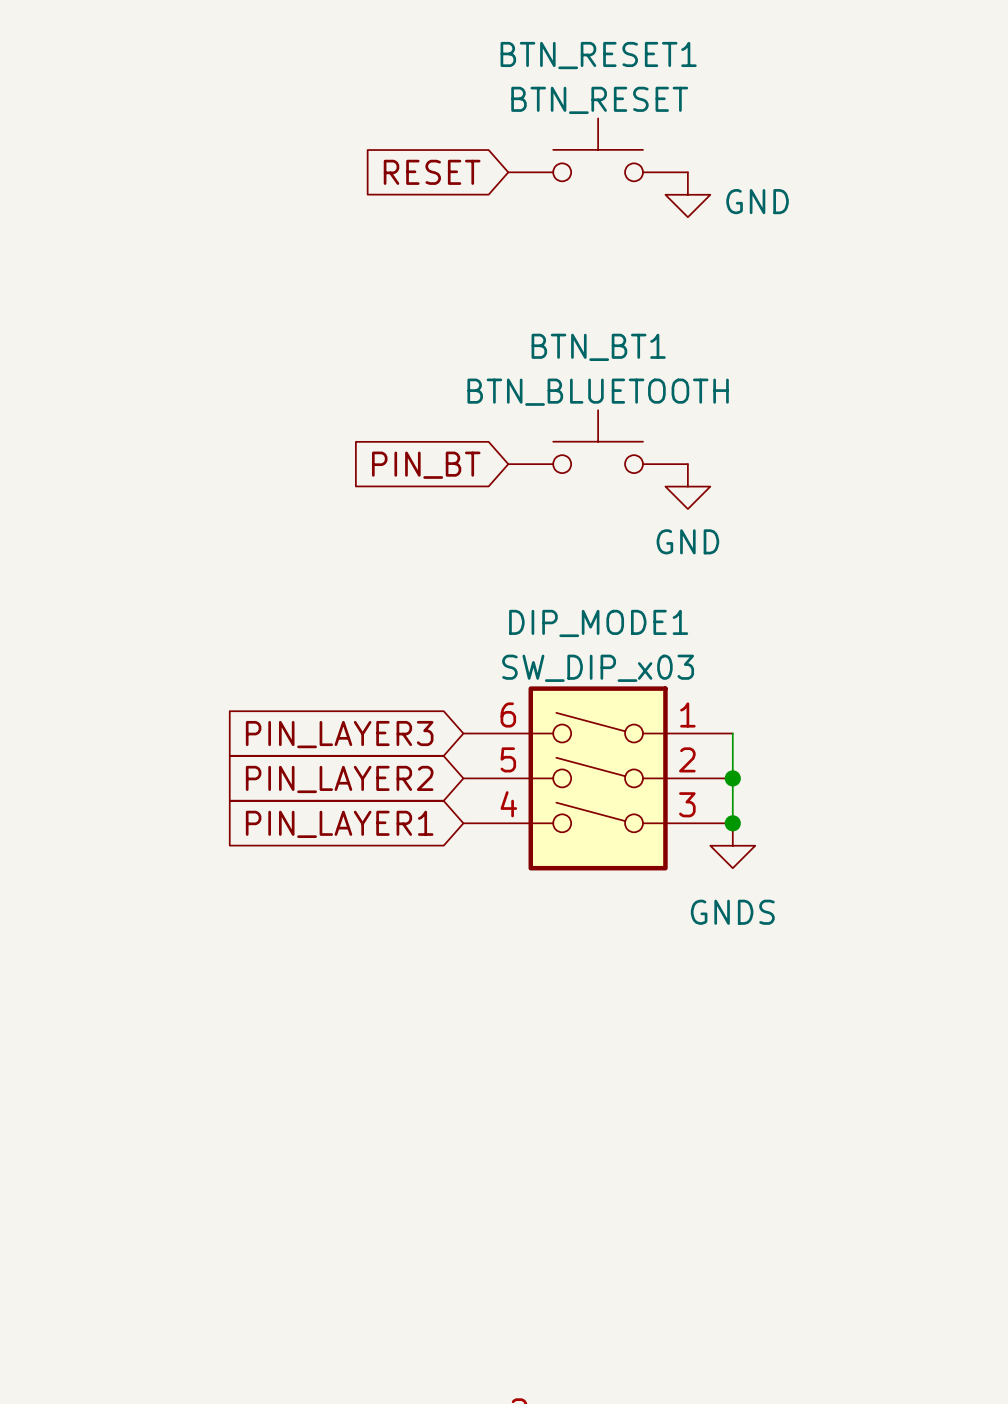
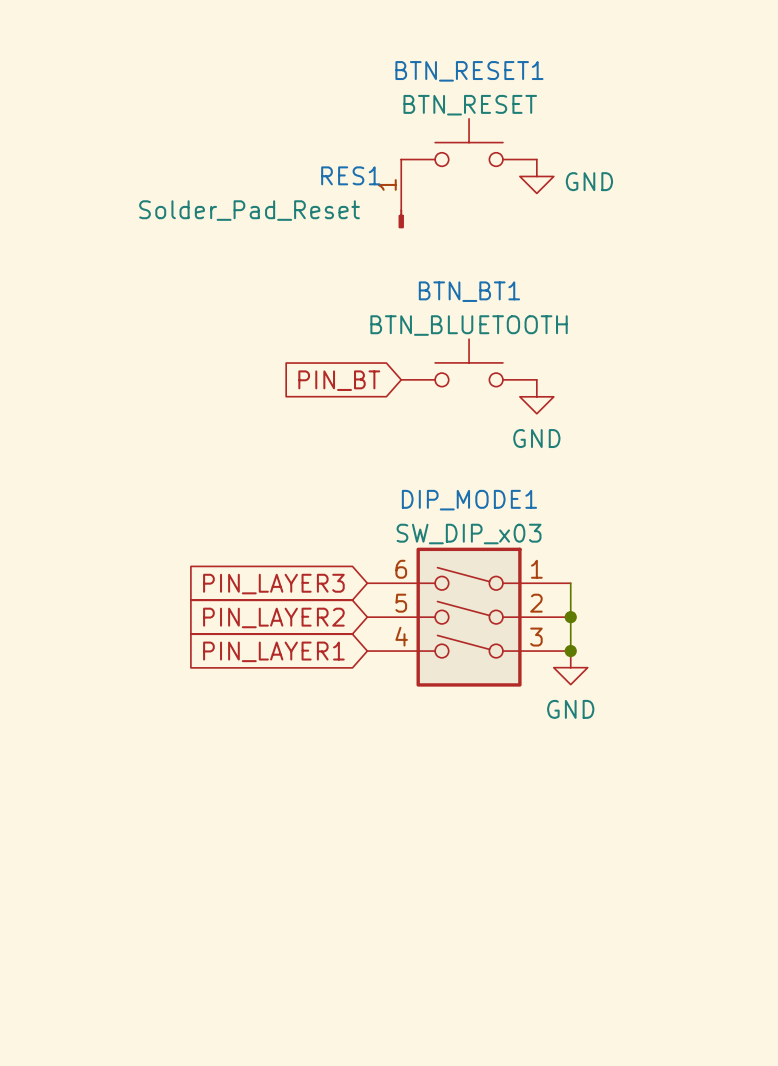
global label: RESET (432, 172) -> none
RES1: none -> Solder_Pad_Reset (401, 193)
power symbol: GNDS (732, 845) -> GND (570, 667)

